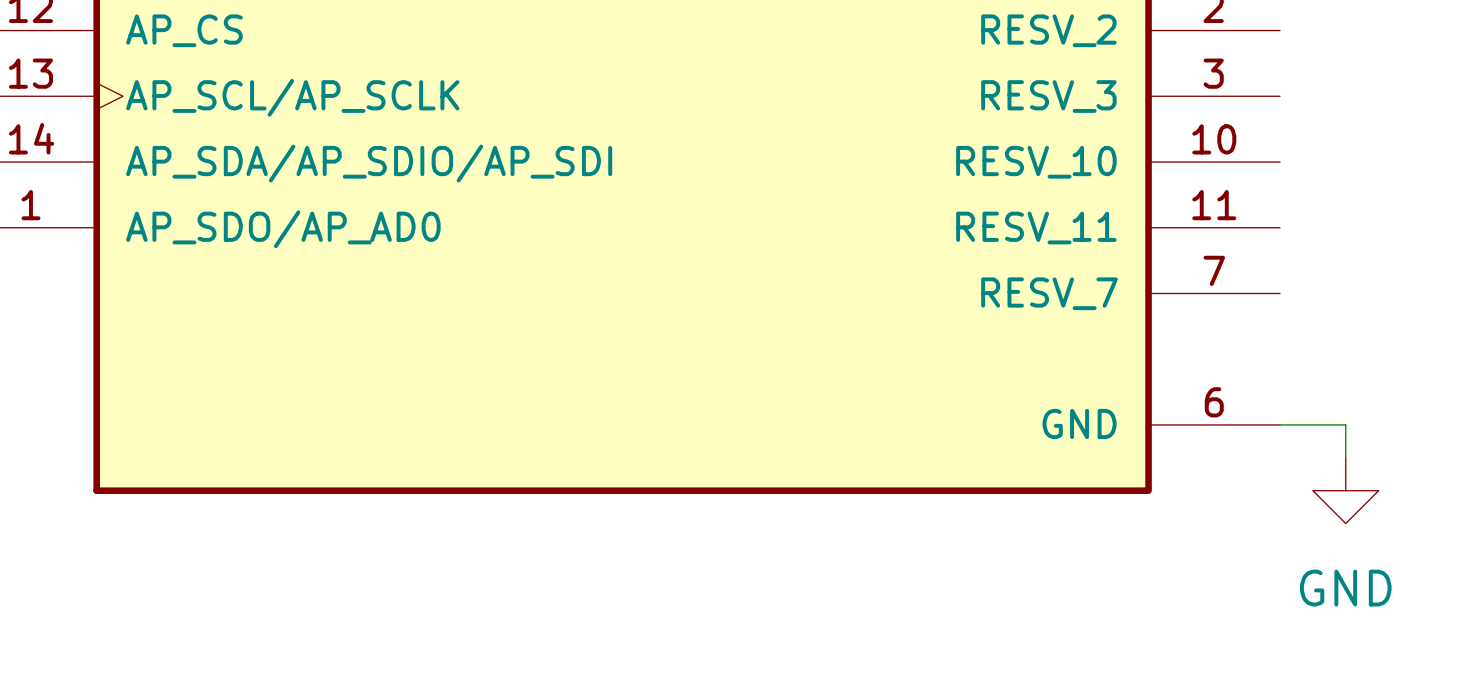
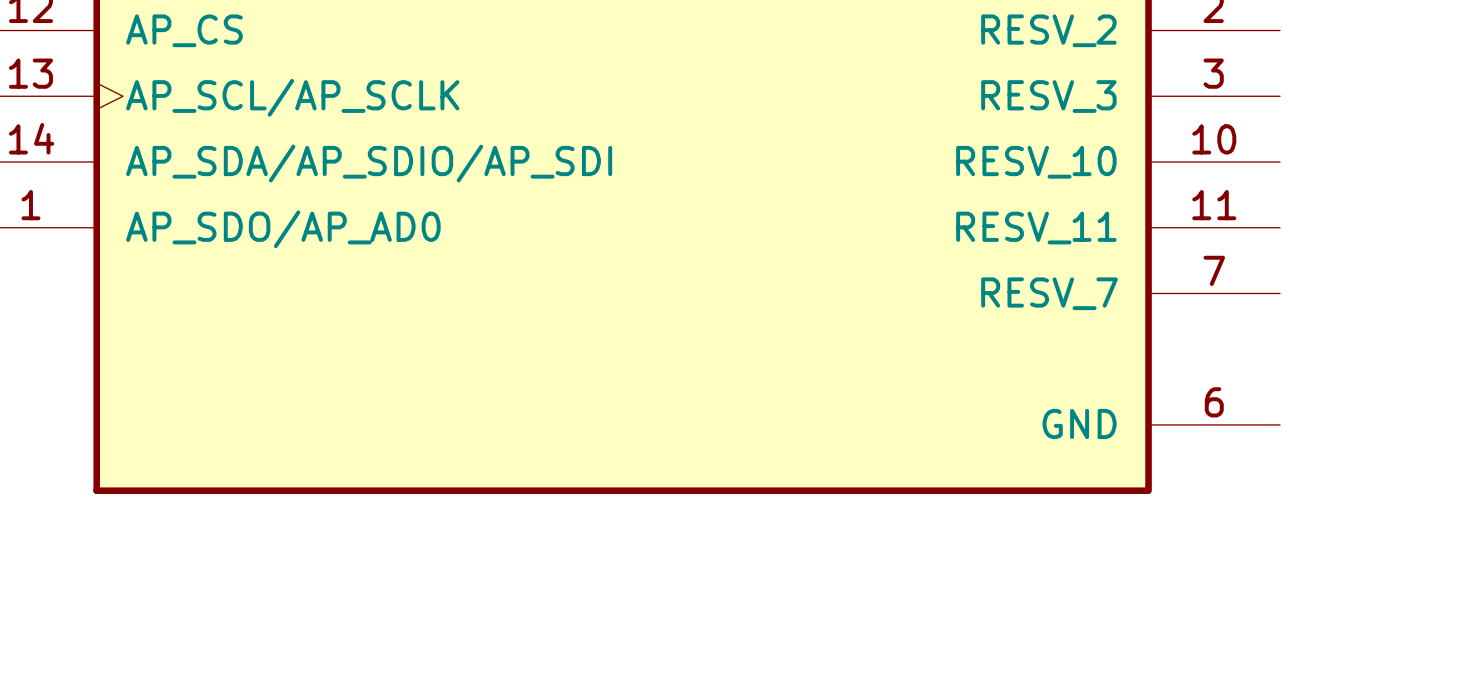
wire: (1280, 424) (1345, 424) (1345, 457) -> none
power symbol: GND (1345, 490) -> none

